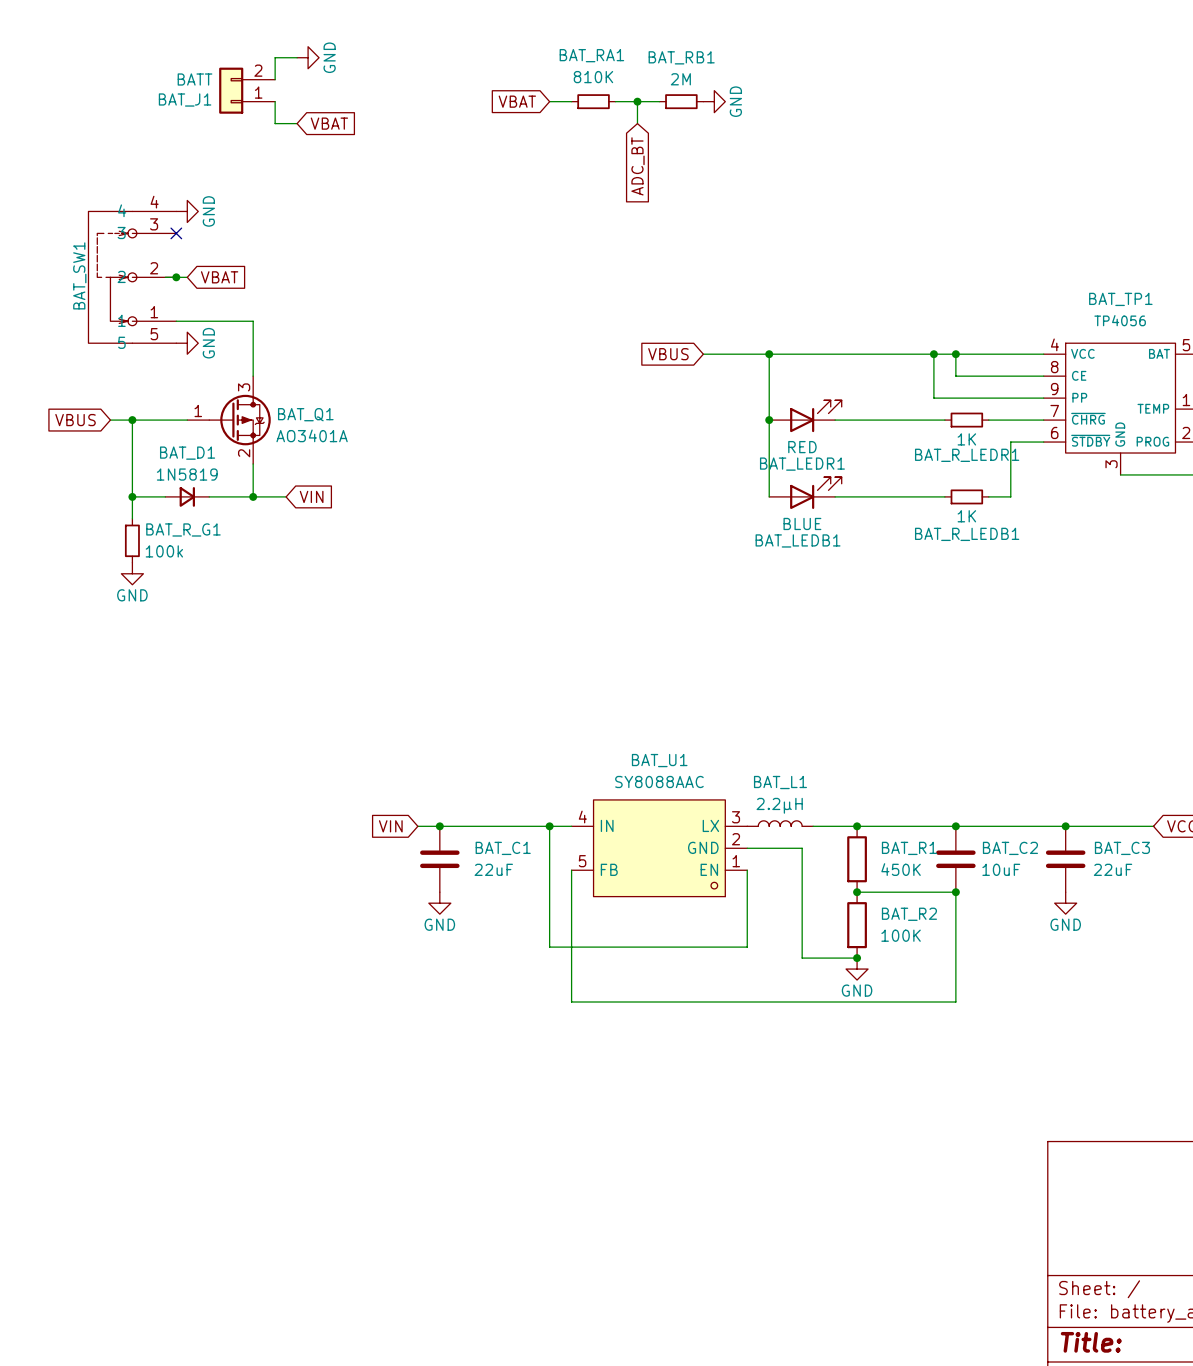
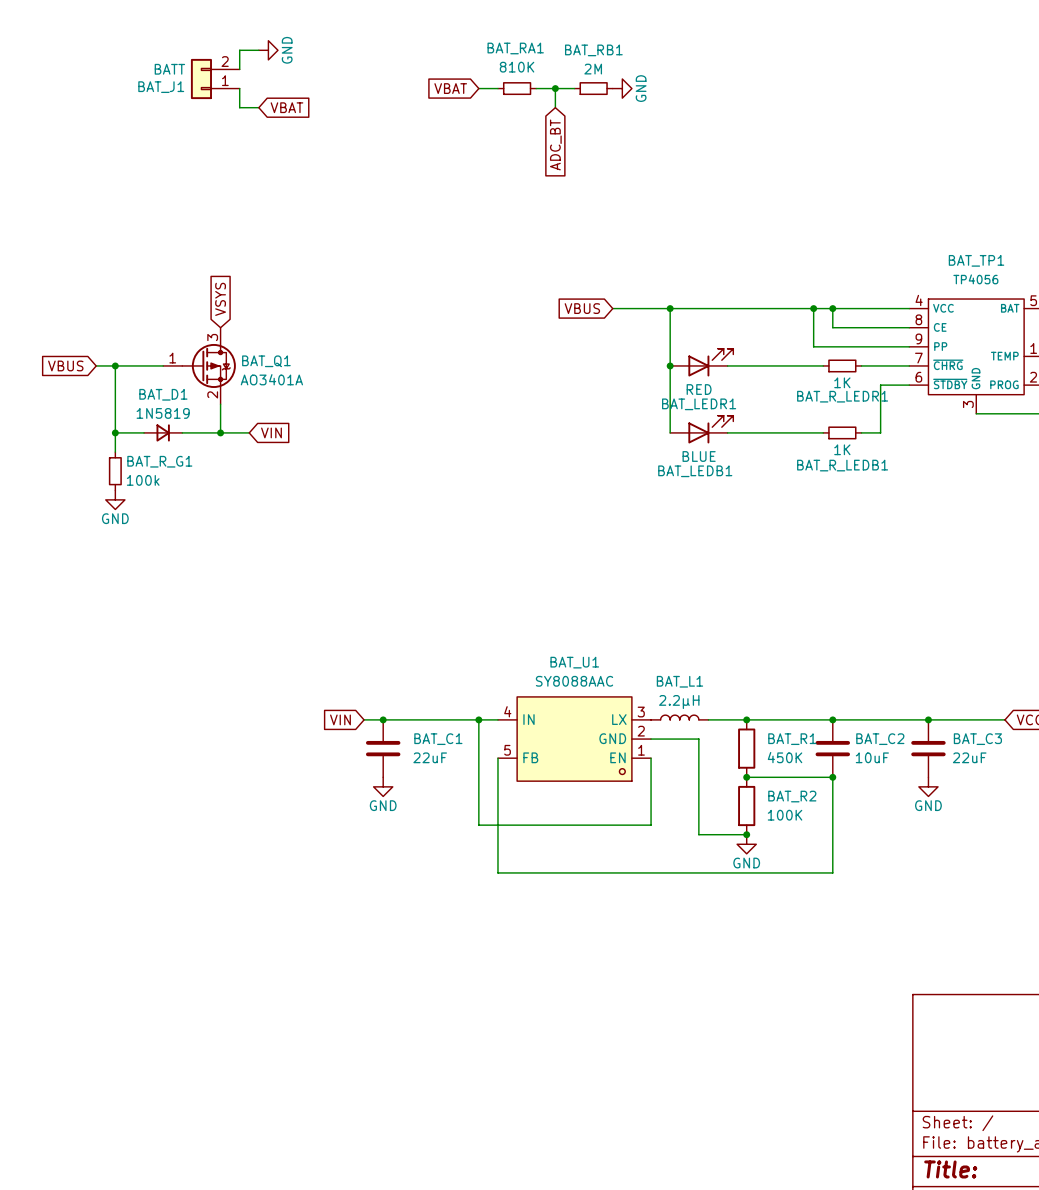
power symbol: GND (187, 211) -> none
no-connect mark: (176, 233) -> none
BAT_SW1: (132, 277) -> none
wire: (165, 277) (187, 277) -> none
junction: (176, 277) -> none
global label: VBAT (219, 277) -> none
wire: (176, 321) (253, 321) (253, 376) -> none
power symbol: GND (187, 343) -> none
global label: none -> VSYS (220, 299)

